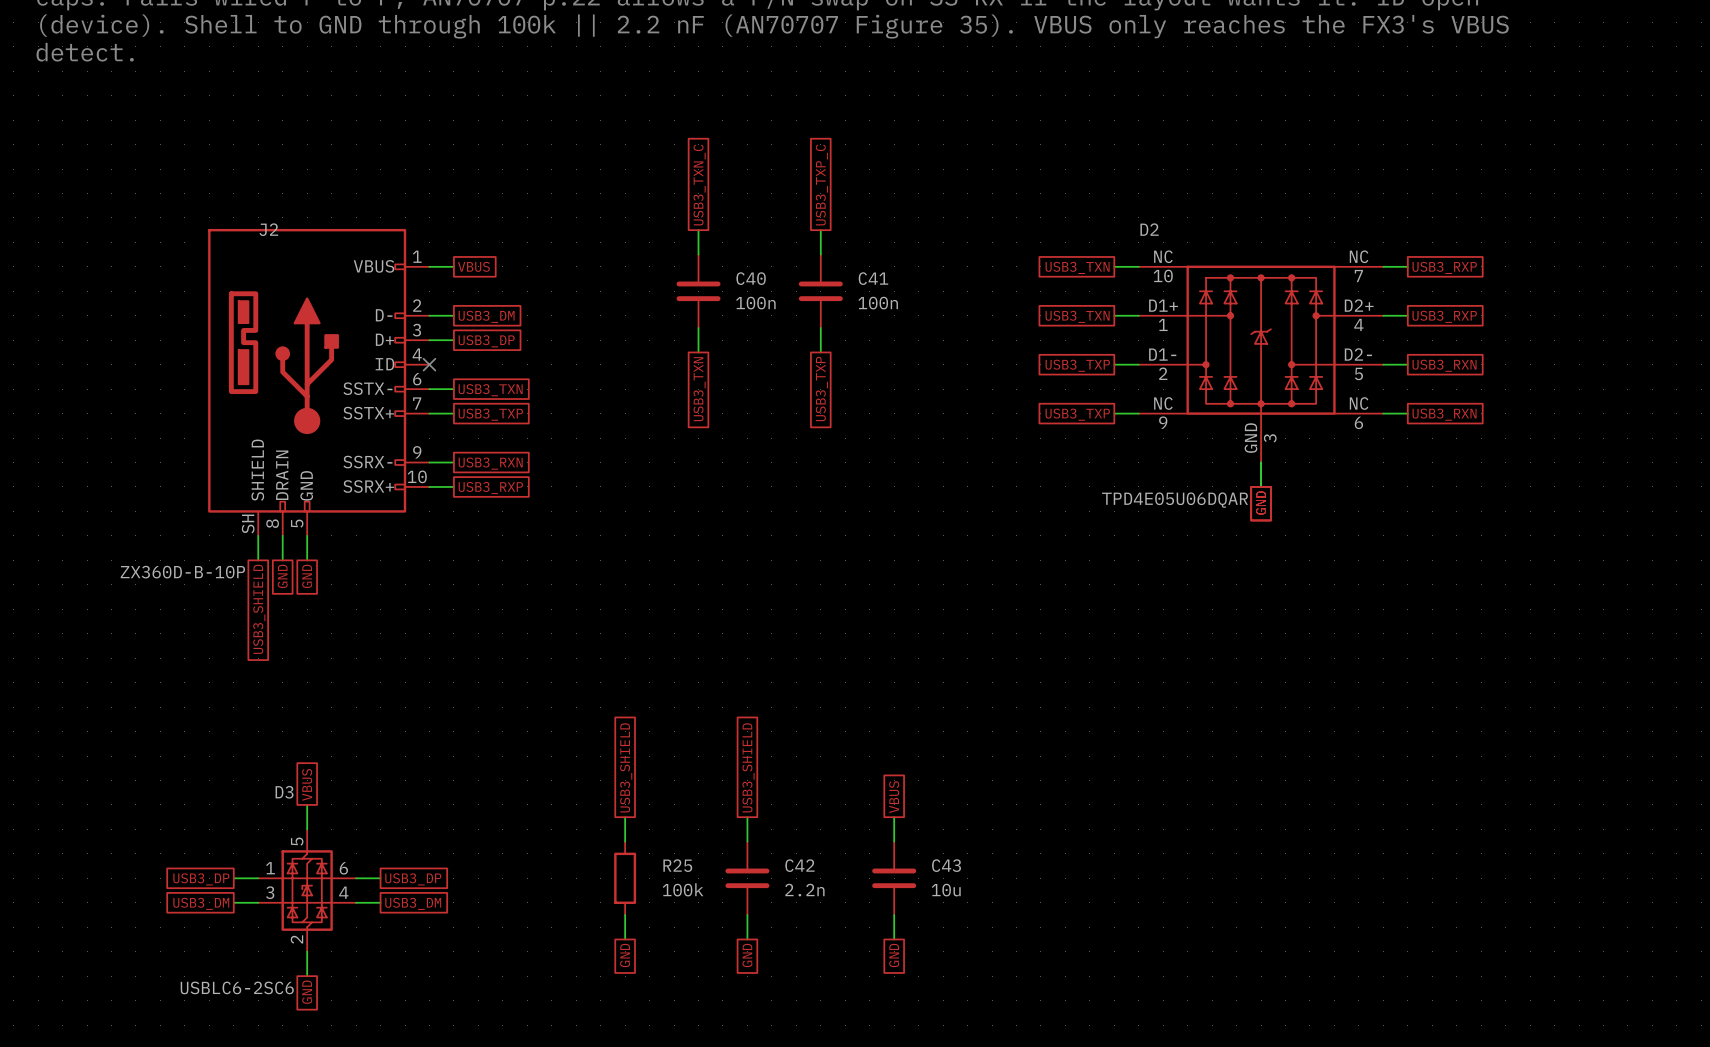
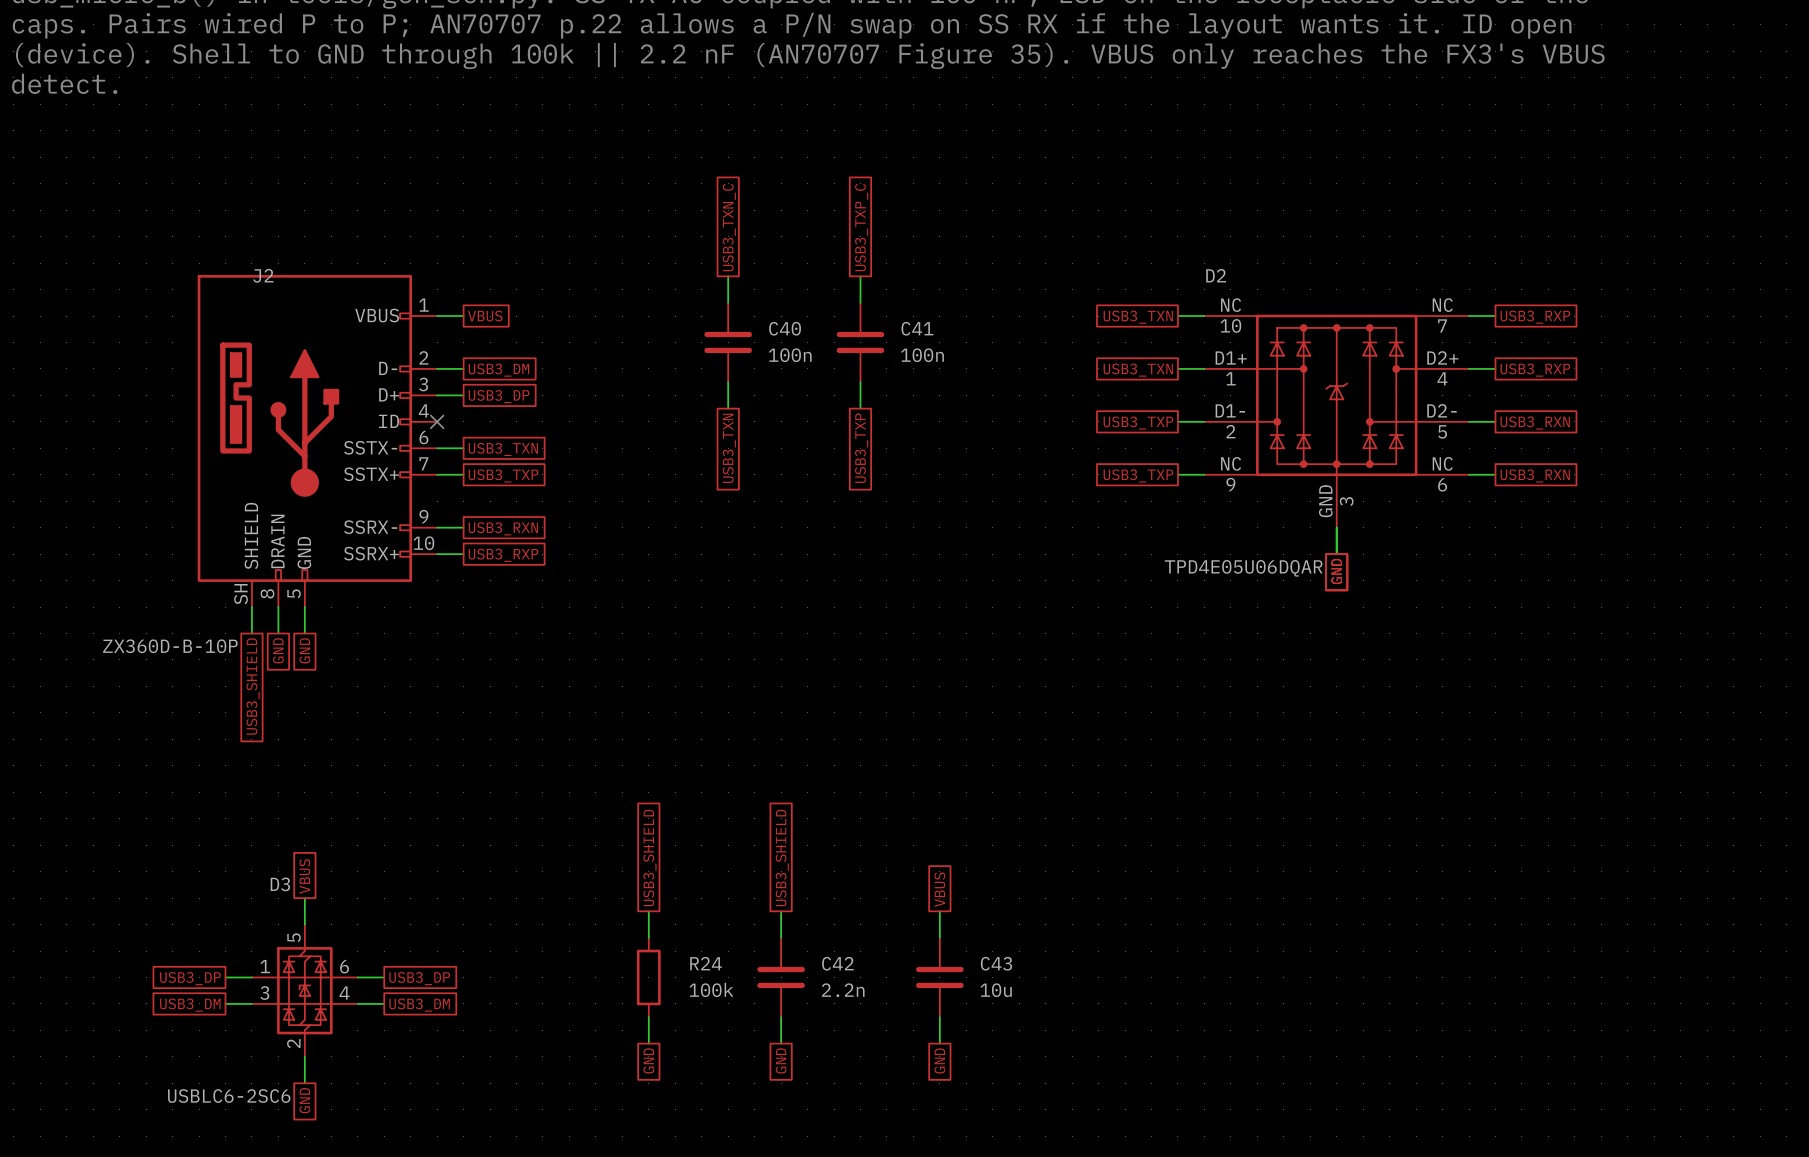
R25 name: R25 (677, 865) -> R24 (706, 963)

